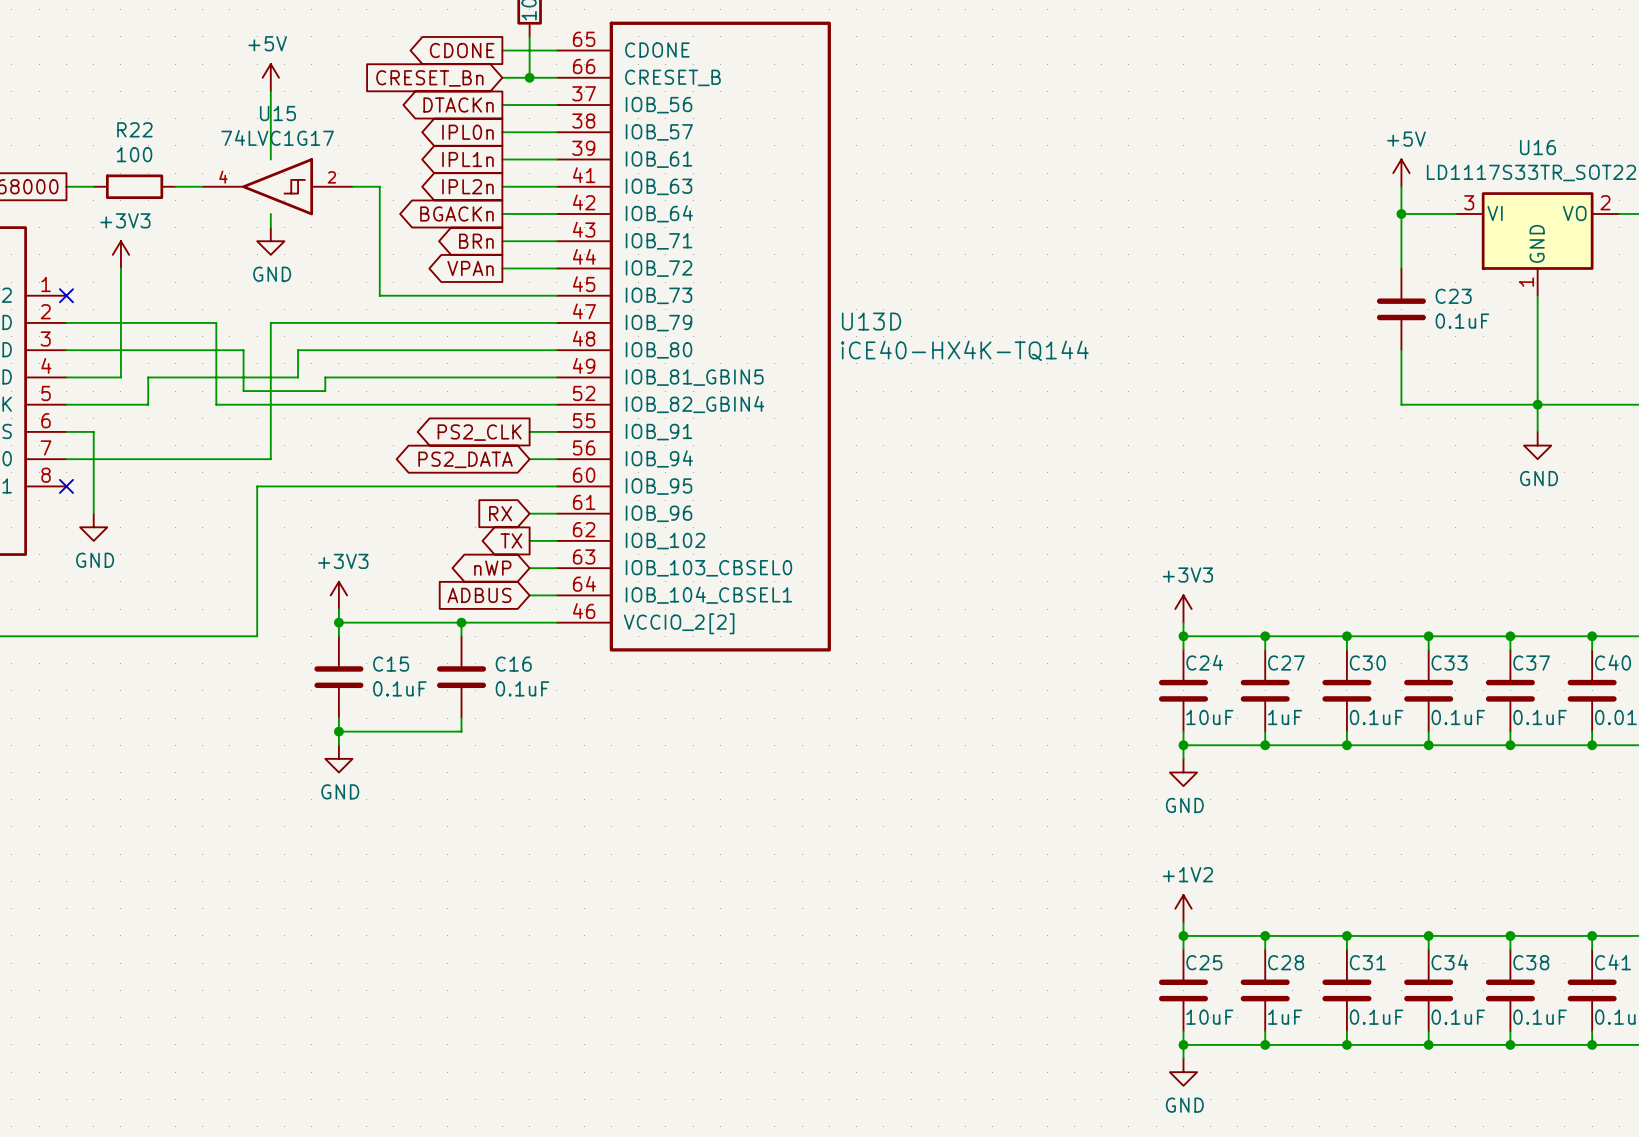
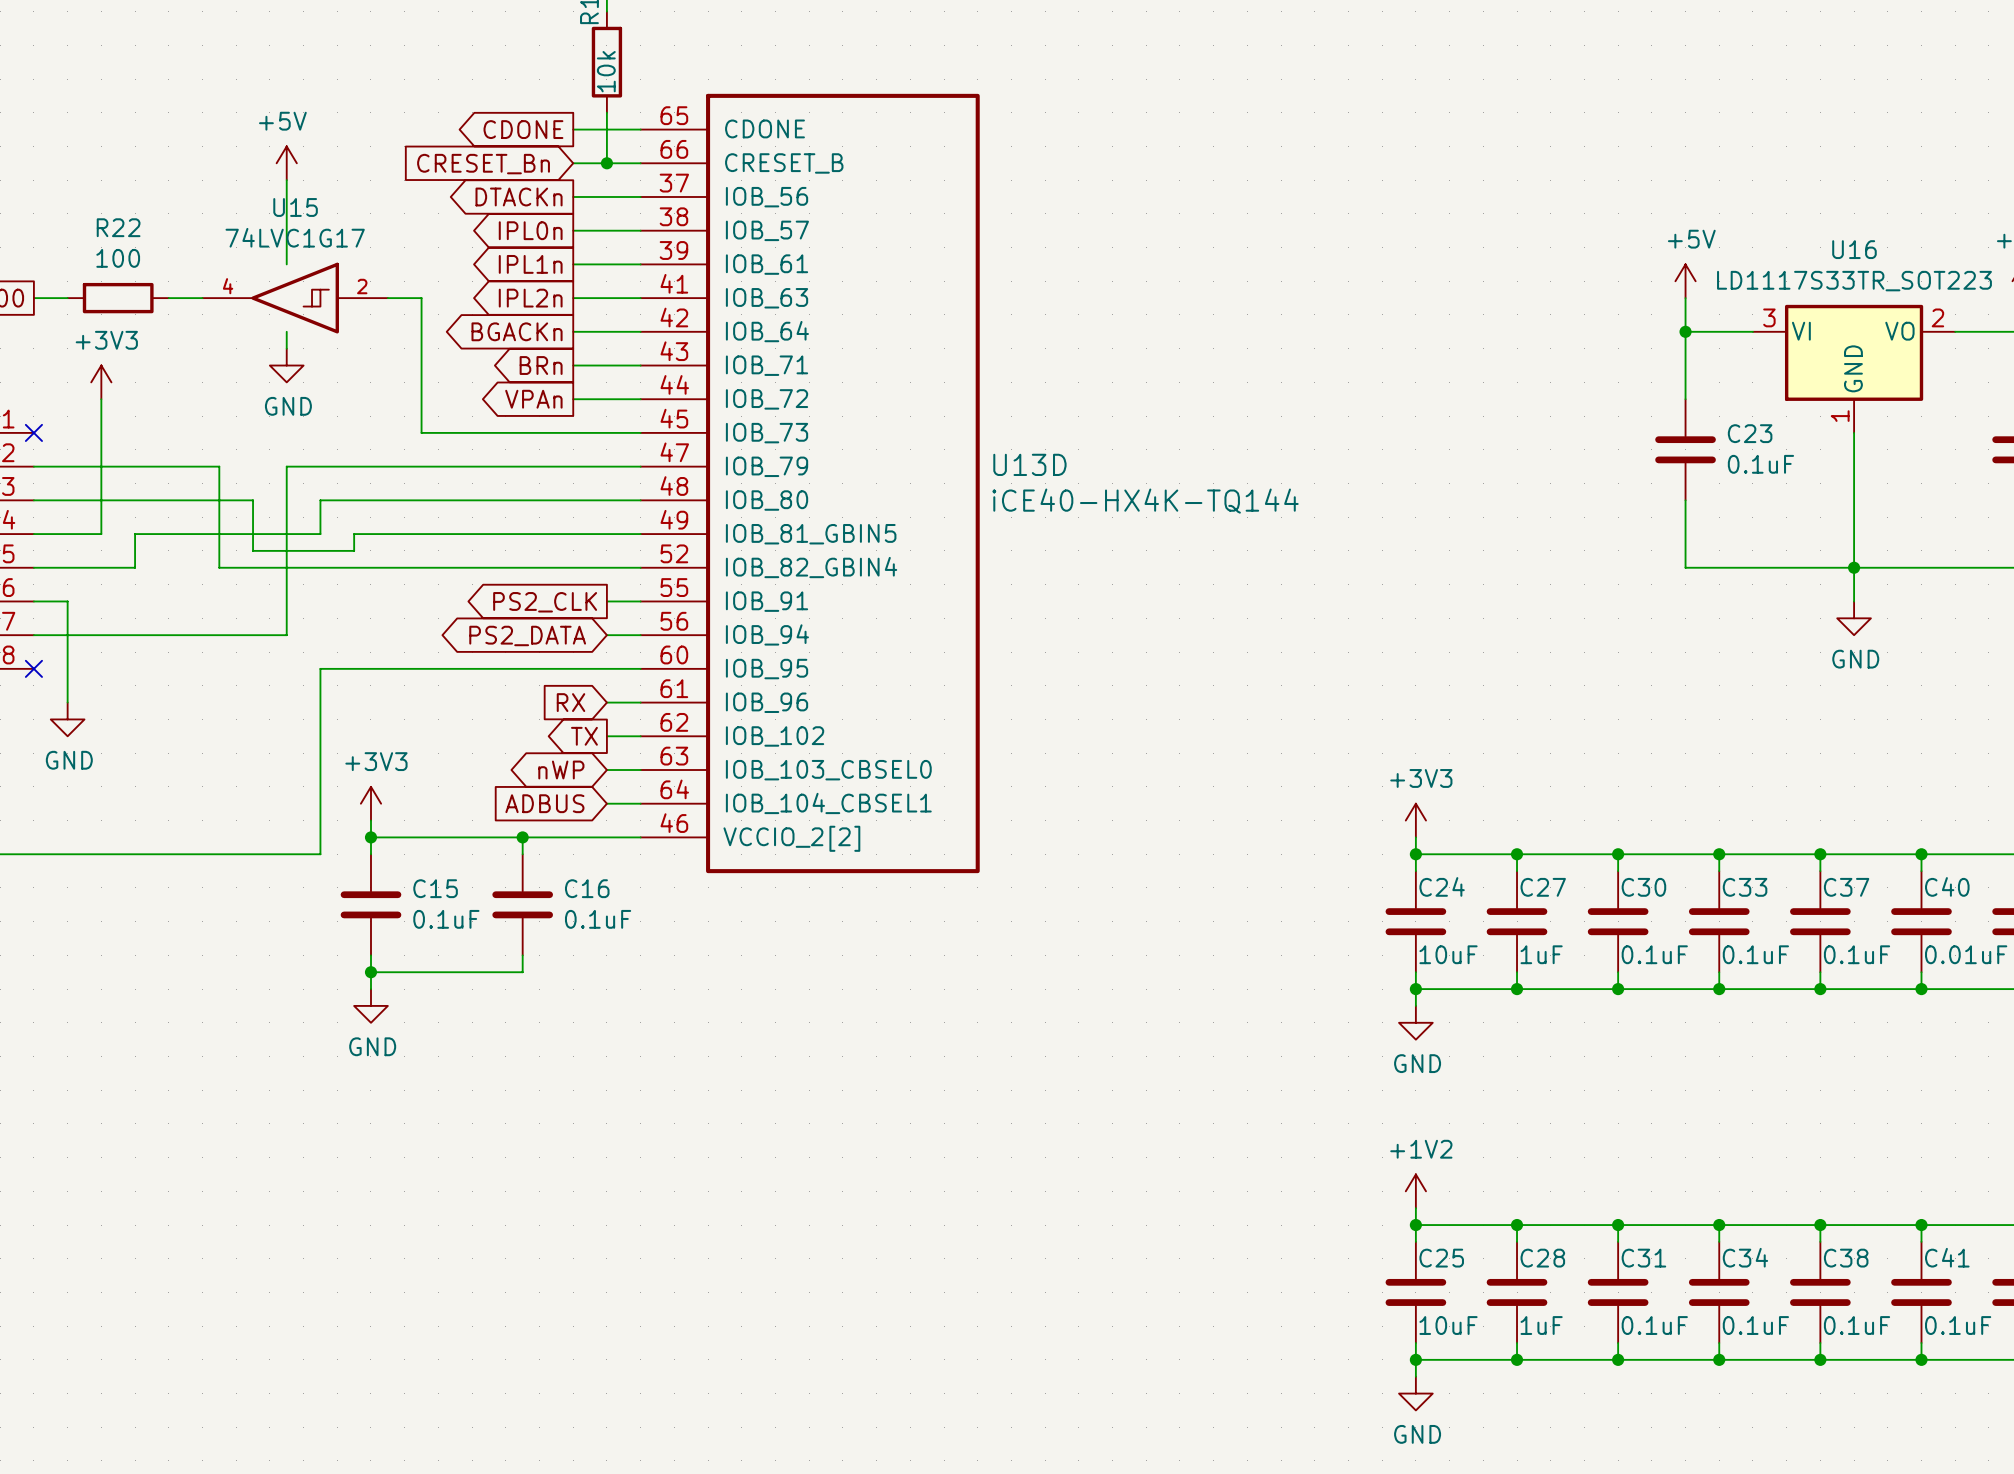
wire: (298, 486) (257, 486) (257, 636) -> (320, 668) (320, 854) (269, 854)

